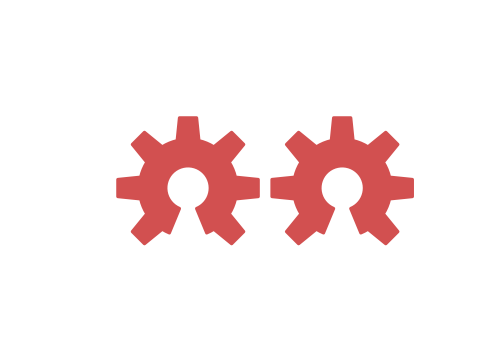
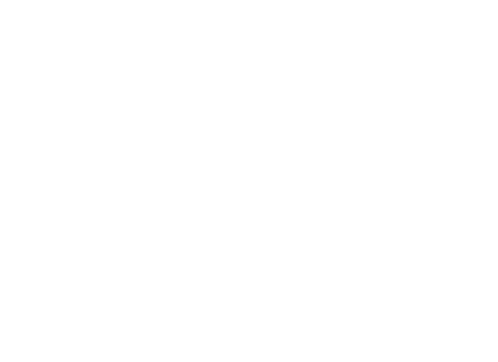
drawing: [116, 116, 414, 246] -> none

